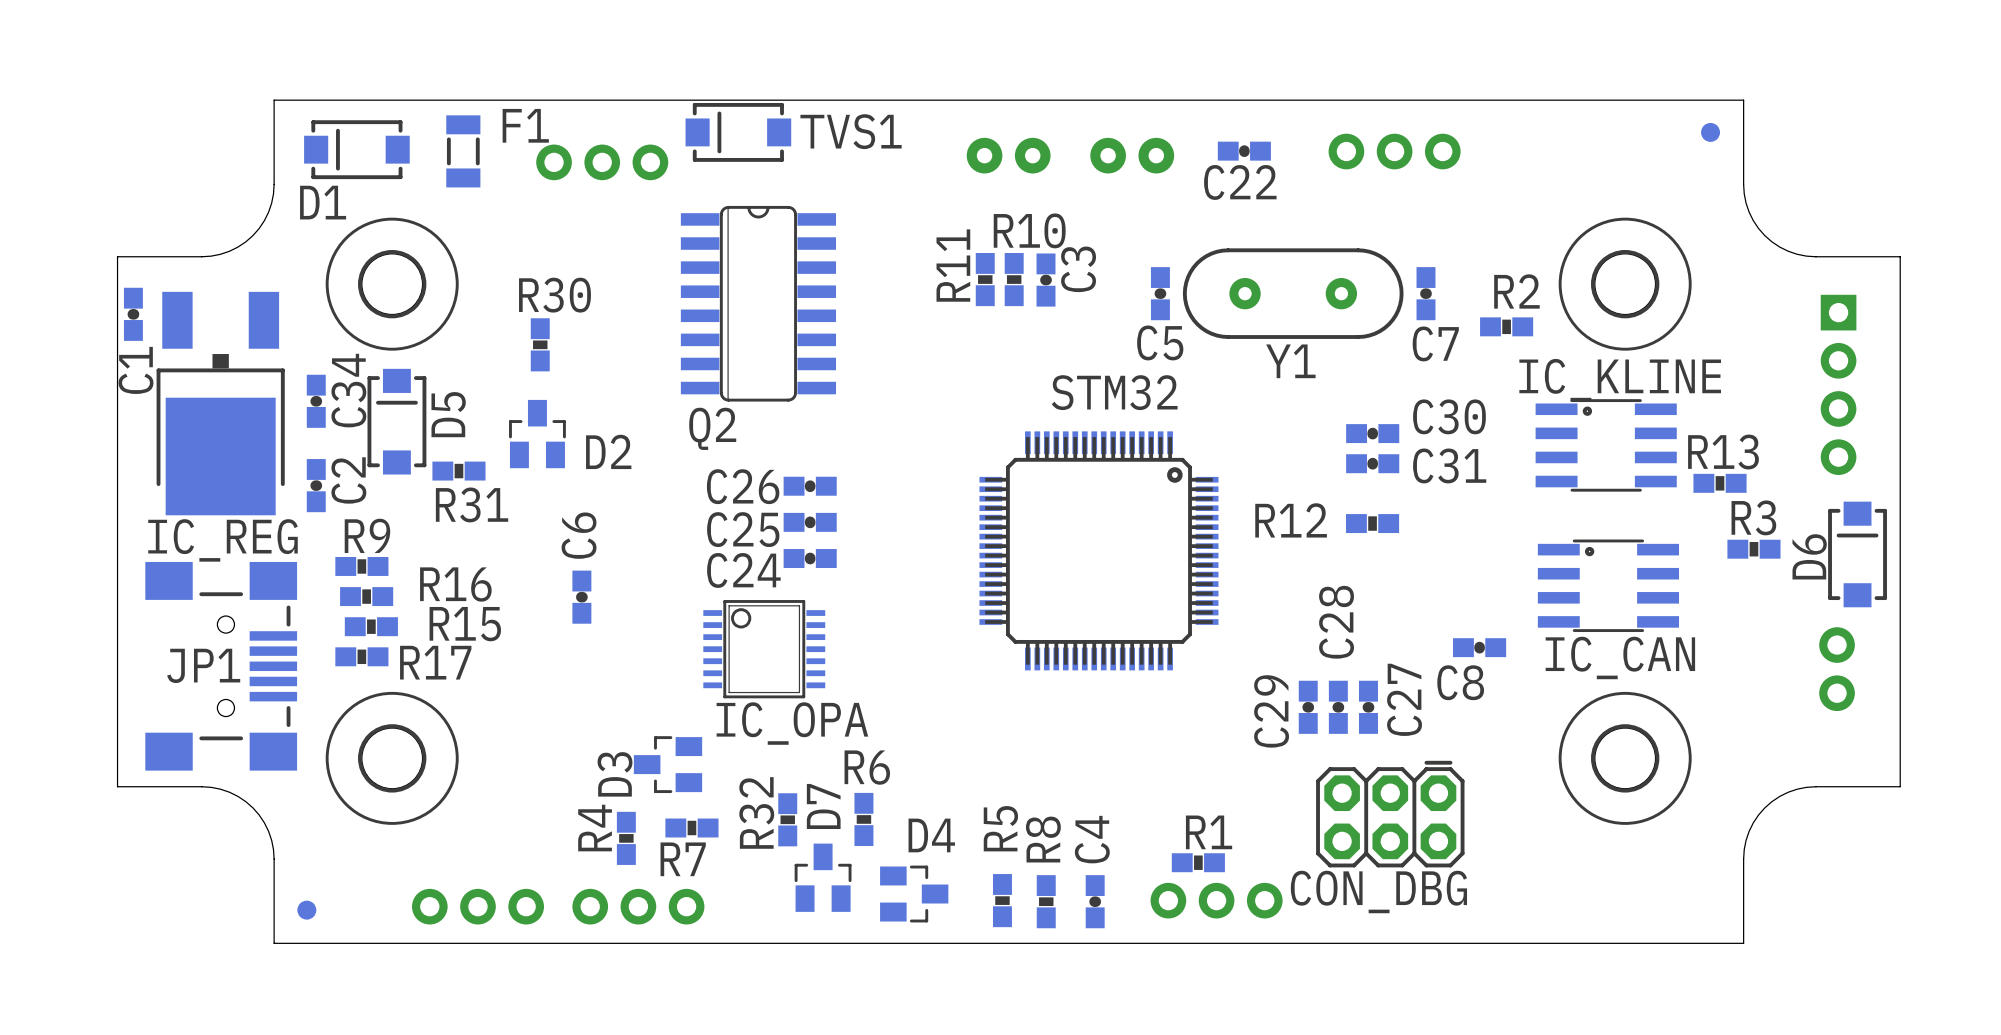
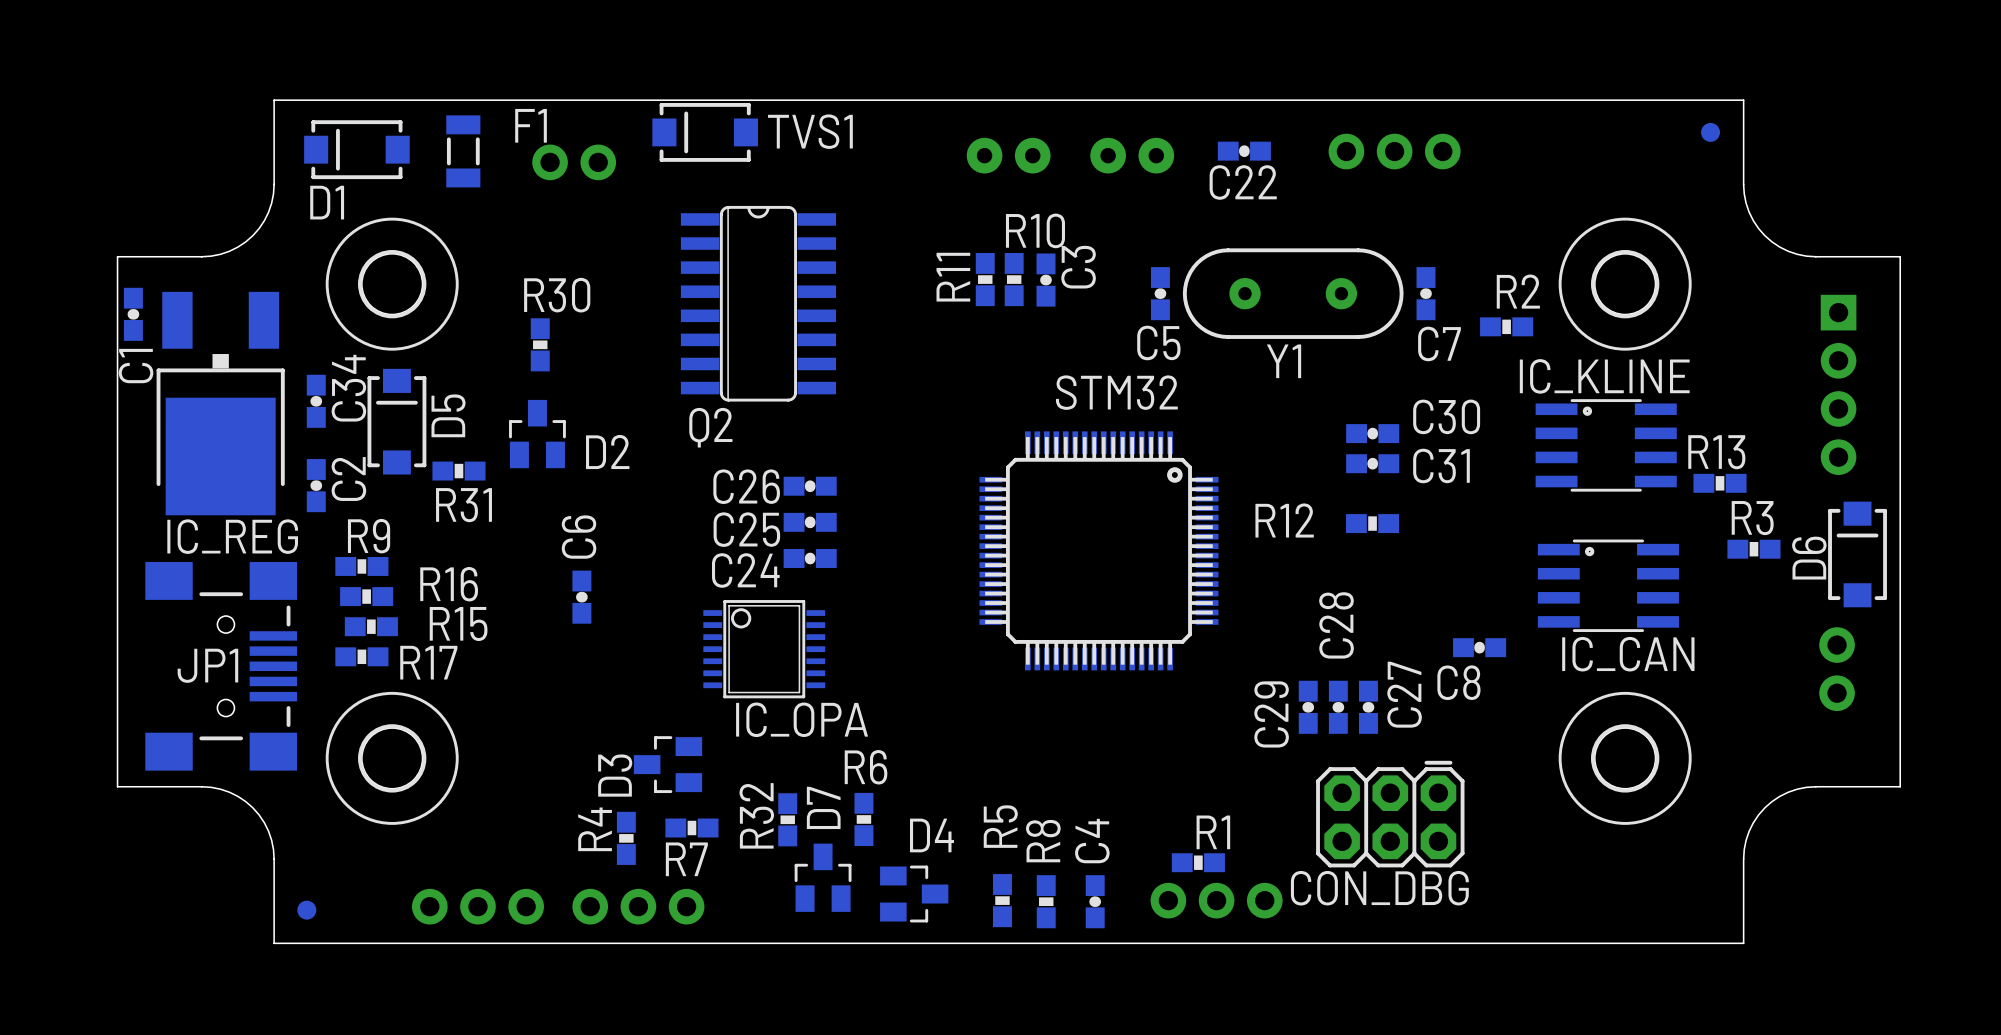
TVS1 position: (738, 132) -> (705, 132)
part: none -> (574, 162)
part: (602, 162) -> none

